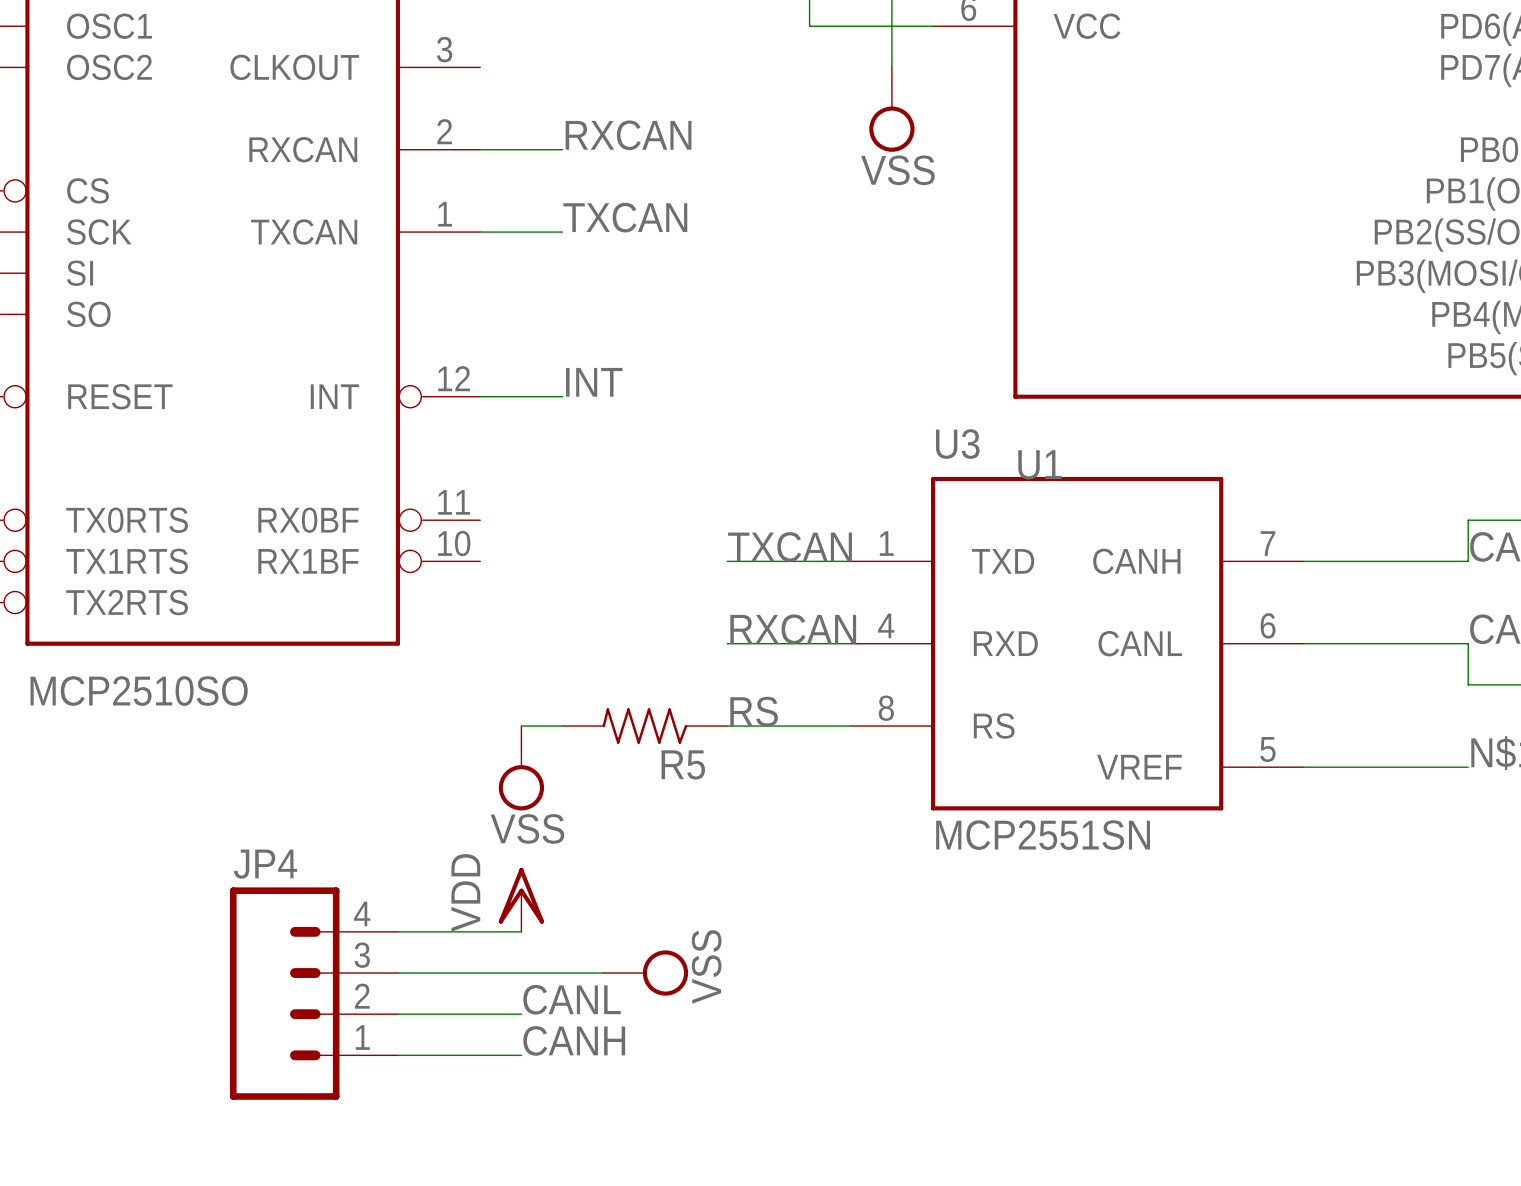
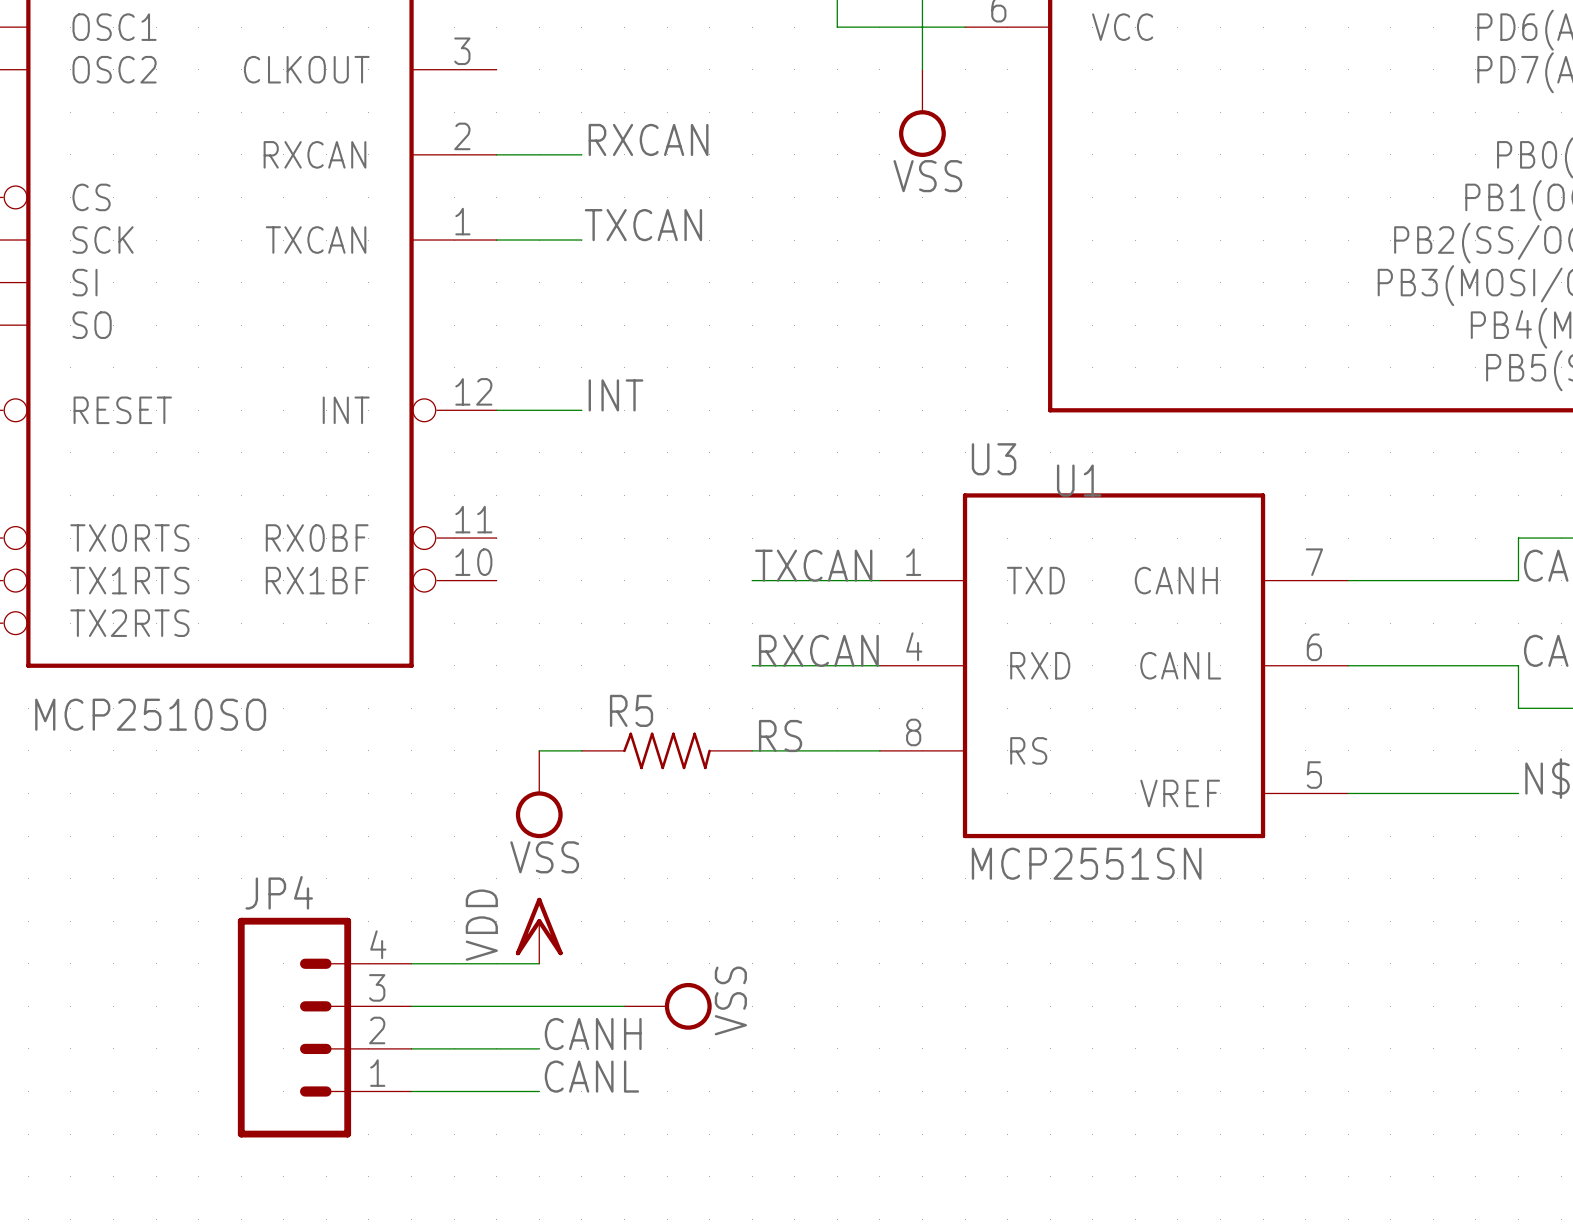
R5 rotation: 0° (644, 726) -> 180° (667, 750)
label: CANL (572, 999) -> CANH (593, 1034)
label: CANH (574, 1040) -> CANL (591, 1076)

